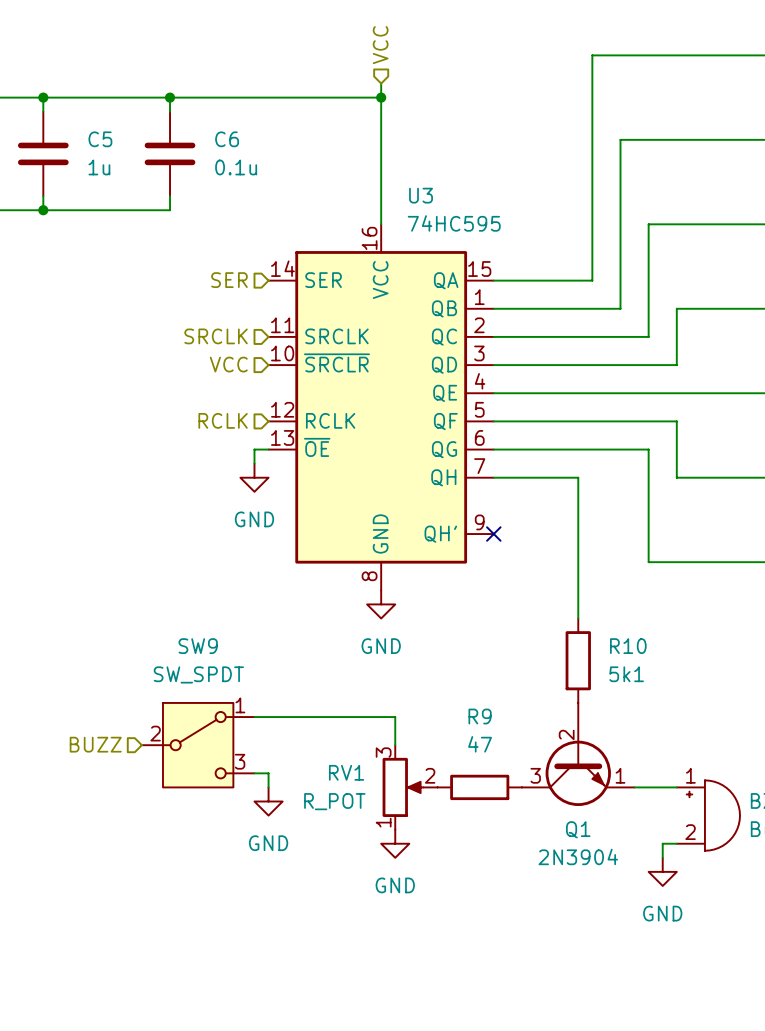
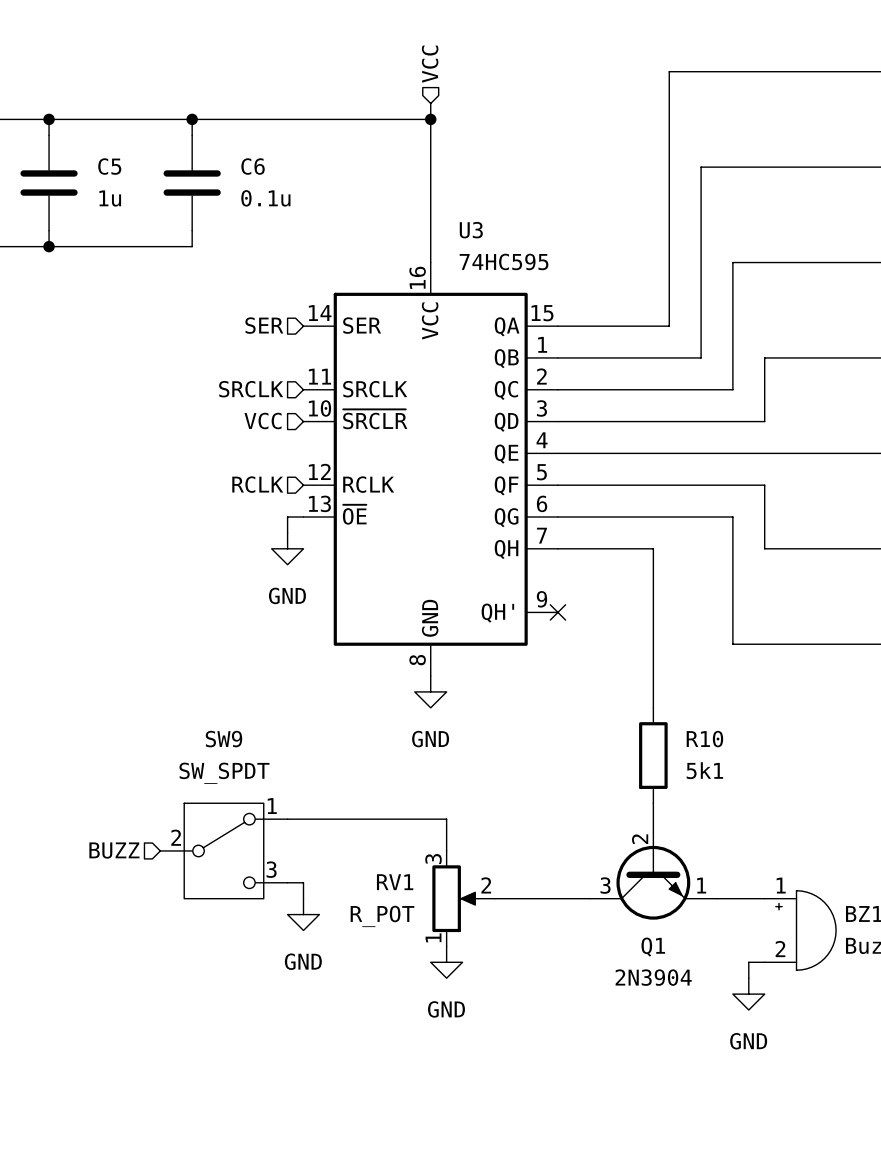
wire: none -> (494, 898) (589, 898)
R9: 47 (479, 787) -> none

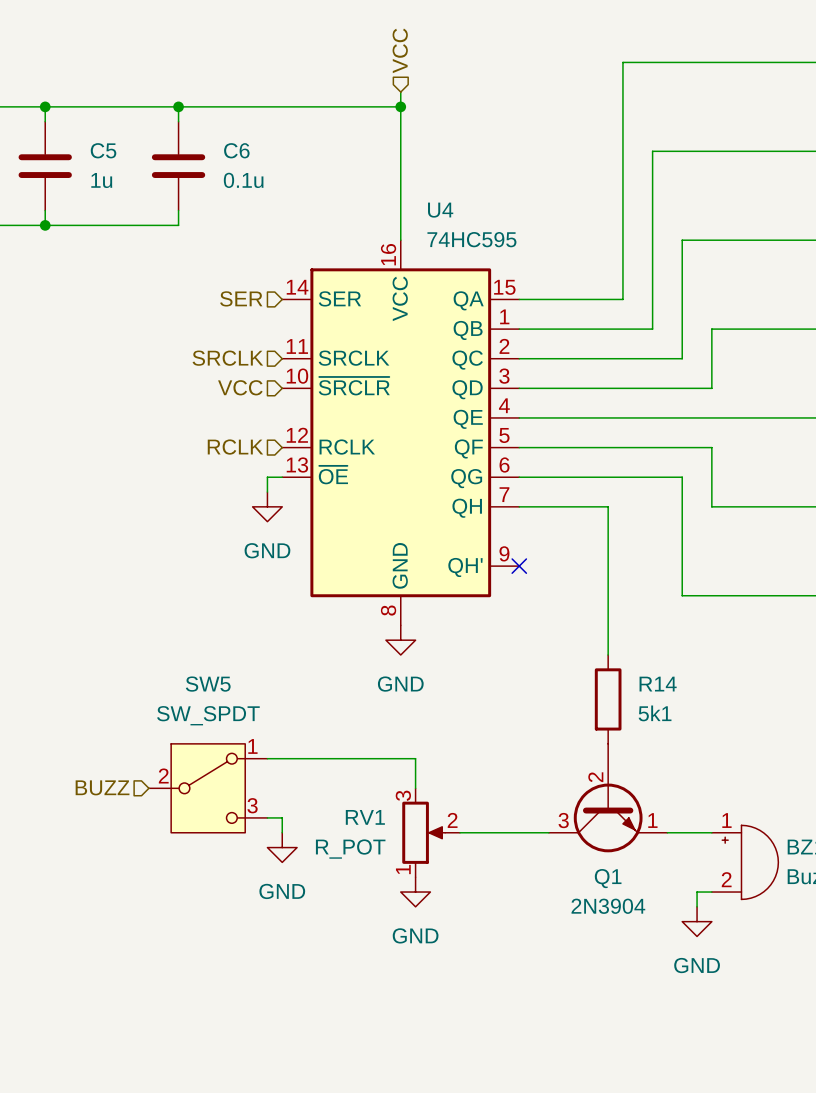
U3 name: U3 (471, 230) -> U4 (440, 210)
SW9 name: SW9 (223, 739) -> SW5 (208, 684)
R10 name: R10 (704, 739) -> R14 (658, 684)

